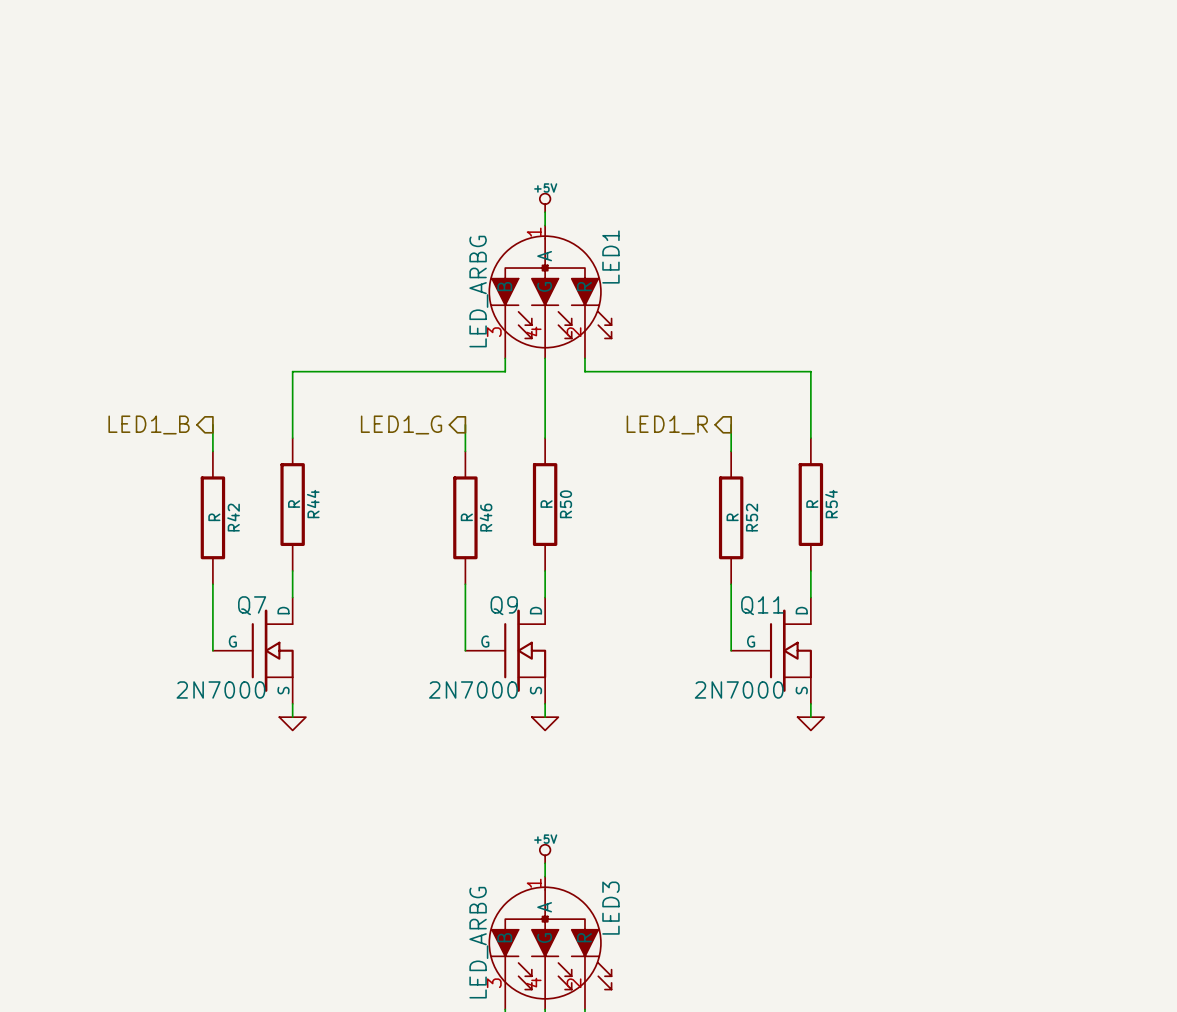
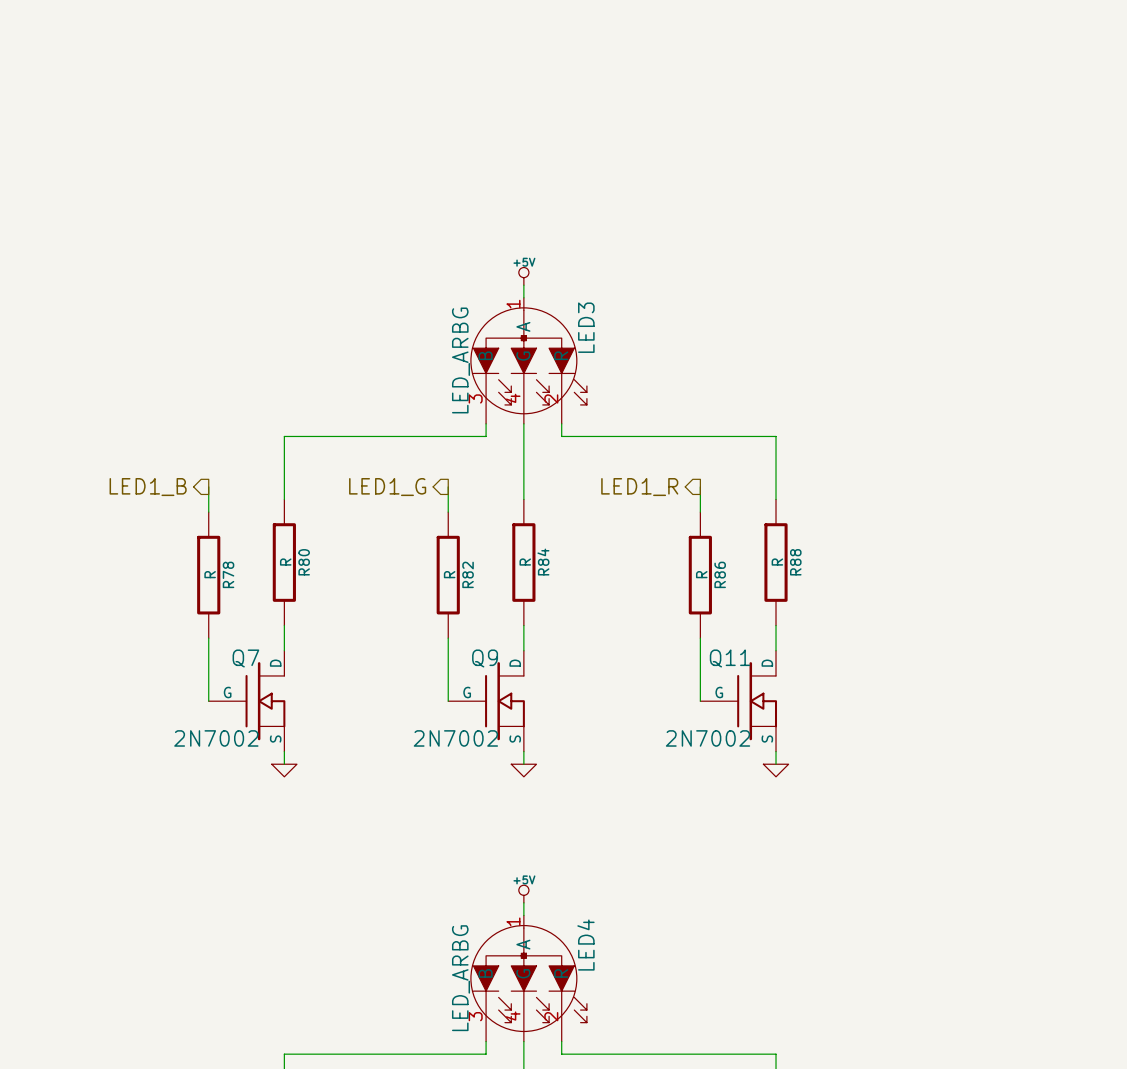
LED1 name: LED1 (610, 257) -> LED3 (586, 327)
R44 name: R44 (313, 504) -> R80 (304, 562)
R50 name: R50 (565, 504) -> R84 (543, 562)
R54 name: R54 (831, 504) -> R88 (795, 562)
R42 name: R42 (233, 517) -> R78 (228, 574)
R46 name: R46 (486, 517) -> R82 (468, 574)
R52 name: R52 (752, 517) -> R86 (720, 574)
Q7 value: 2N7000 (220, 689) -> 2N7002 (216, 738)
Q9 value: 2N7000 (473, 689) -> 2N7002 (455, 738)
Q11 value: 2N7000 (739, 689) -> 2N7002 (708, 738)
LED3 name: LED3 (610, 908) -> LED4 (585, 945)

